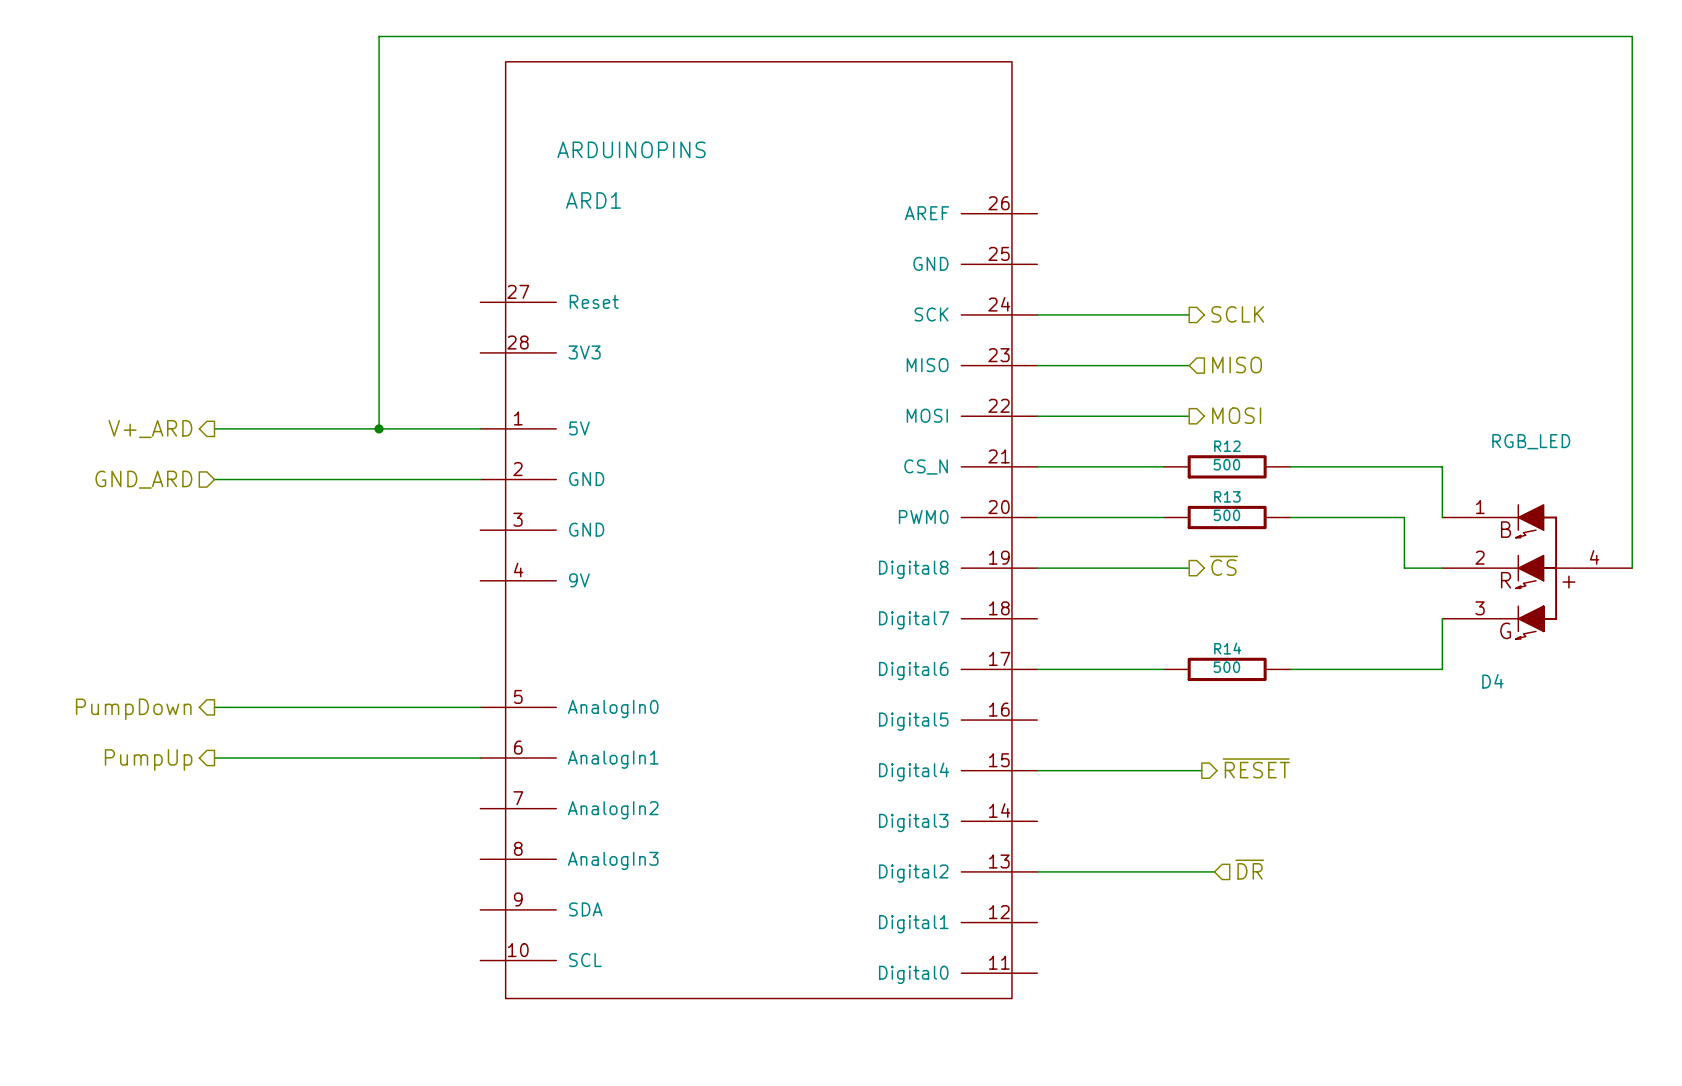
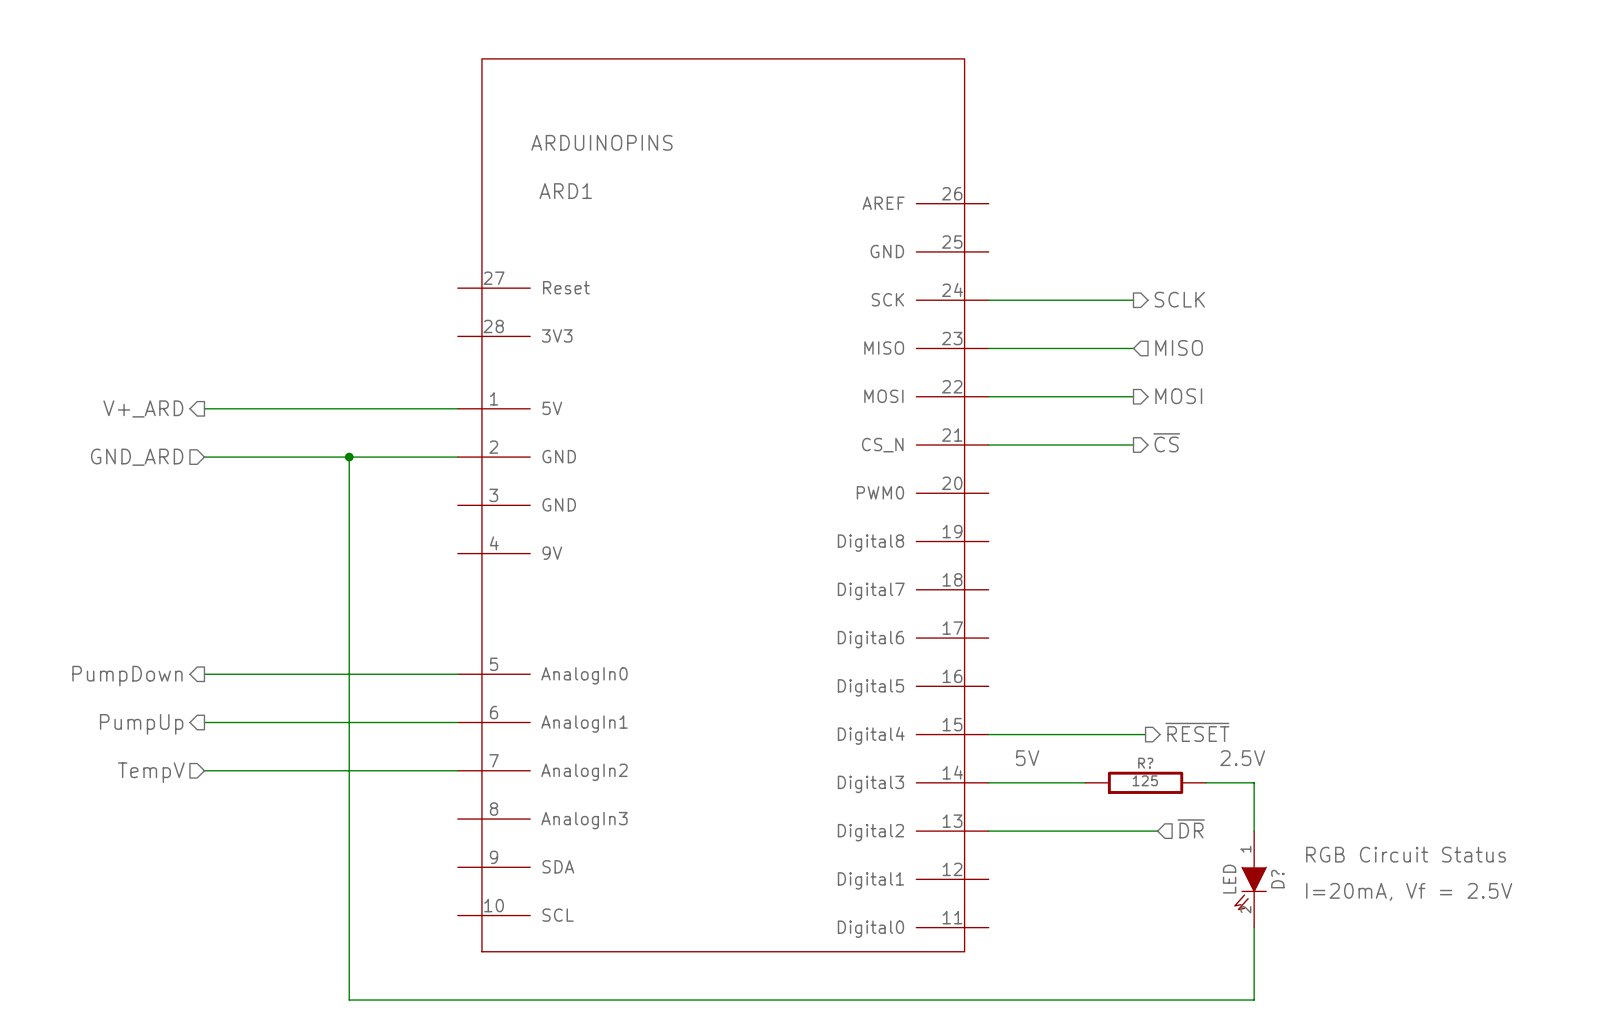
wire: (379, 428) (379, 36) (1632, 36) (1632, 568) -> none
junction position: (379, 428) -> (349, 457)
R12: 500 (1227, 466) -> none
wire: (1290, 466) (1442, 466) (1442, 517) -> none
wire: none -> (349, 457) (349, 1000) (1254, 1000) (1254, 927)
wire: (1037, 517) (1163, 517) -> none
R13: 500 (1227, 517) -> none
wire: (1290, 517) (1404, 517) (1404, 568) (1442, 568) -> none
hierarchical label position: ~{CS} (1224, 565) -> ~{CS} (1166, 442)
wire: (1037, 568) (1189, 568) -> none
D4: RGB_LED (1537, 571) -> none
wire: (1442, 618) (1442, 669) (1290, 669) -> none
wire: (1037, 669) (1163, 669) -> none
R14: 500 (1227, 669) -> none
label: none -> 5V (1027, 758)
label: none -> 2.5V (1242, 758)
wire: none -> (204, 770) (457, 770)
hierarchical label: none -> TempV (151, 772)
wire: none -> (988, 782) (1085, 782)
R?: none -> 125 (1145, 782)
wire: none -> (1205, 782) (1254, 782) (1254, 831)
label: none -> RGB Circuit Status (1406, 854)
D?: none -> LED (1250, 879)
label: none -> I=20mA, Vf = 2.5V (1409, 891)

